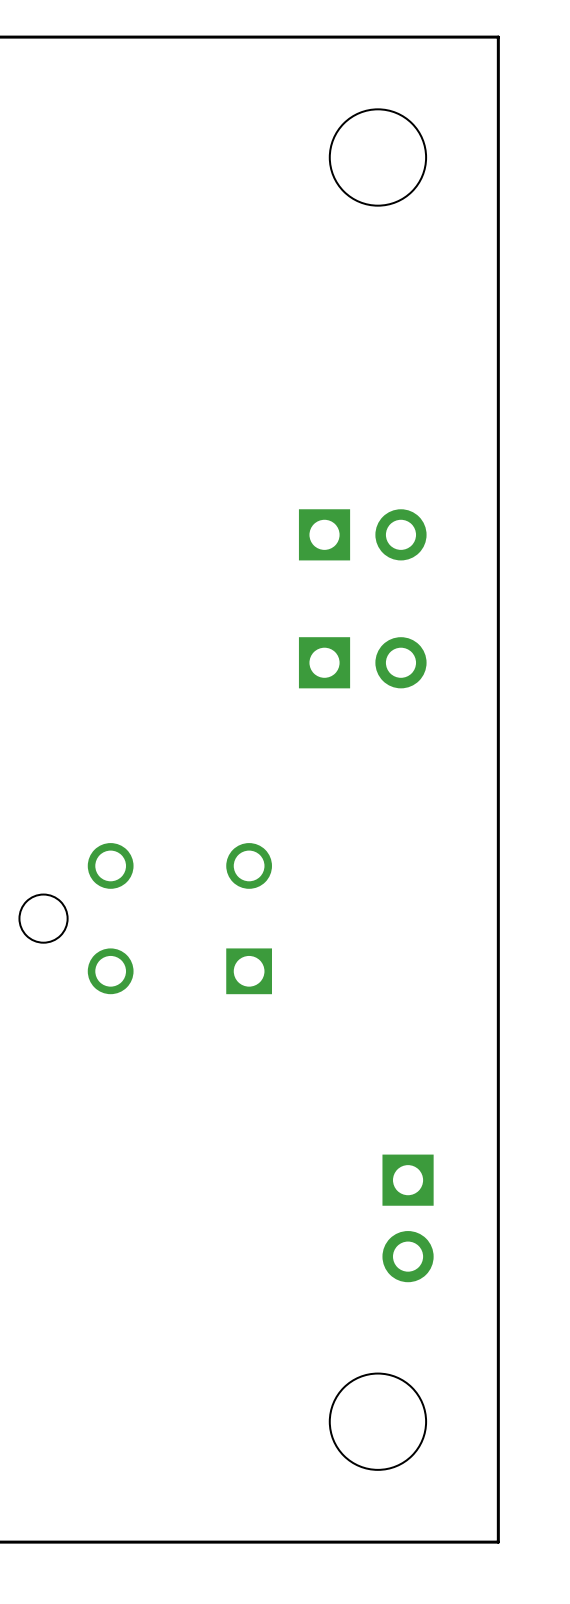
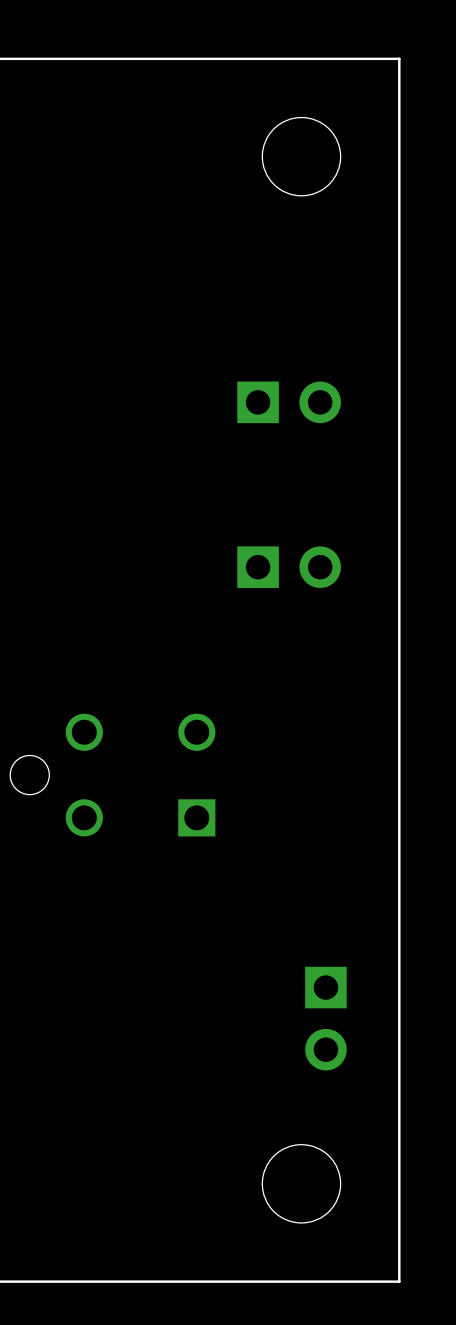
part position: (362, 534) -> (289, 402)

